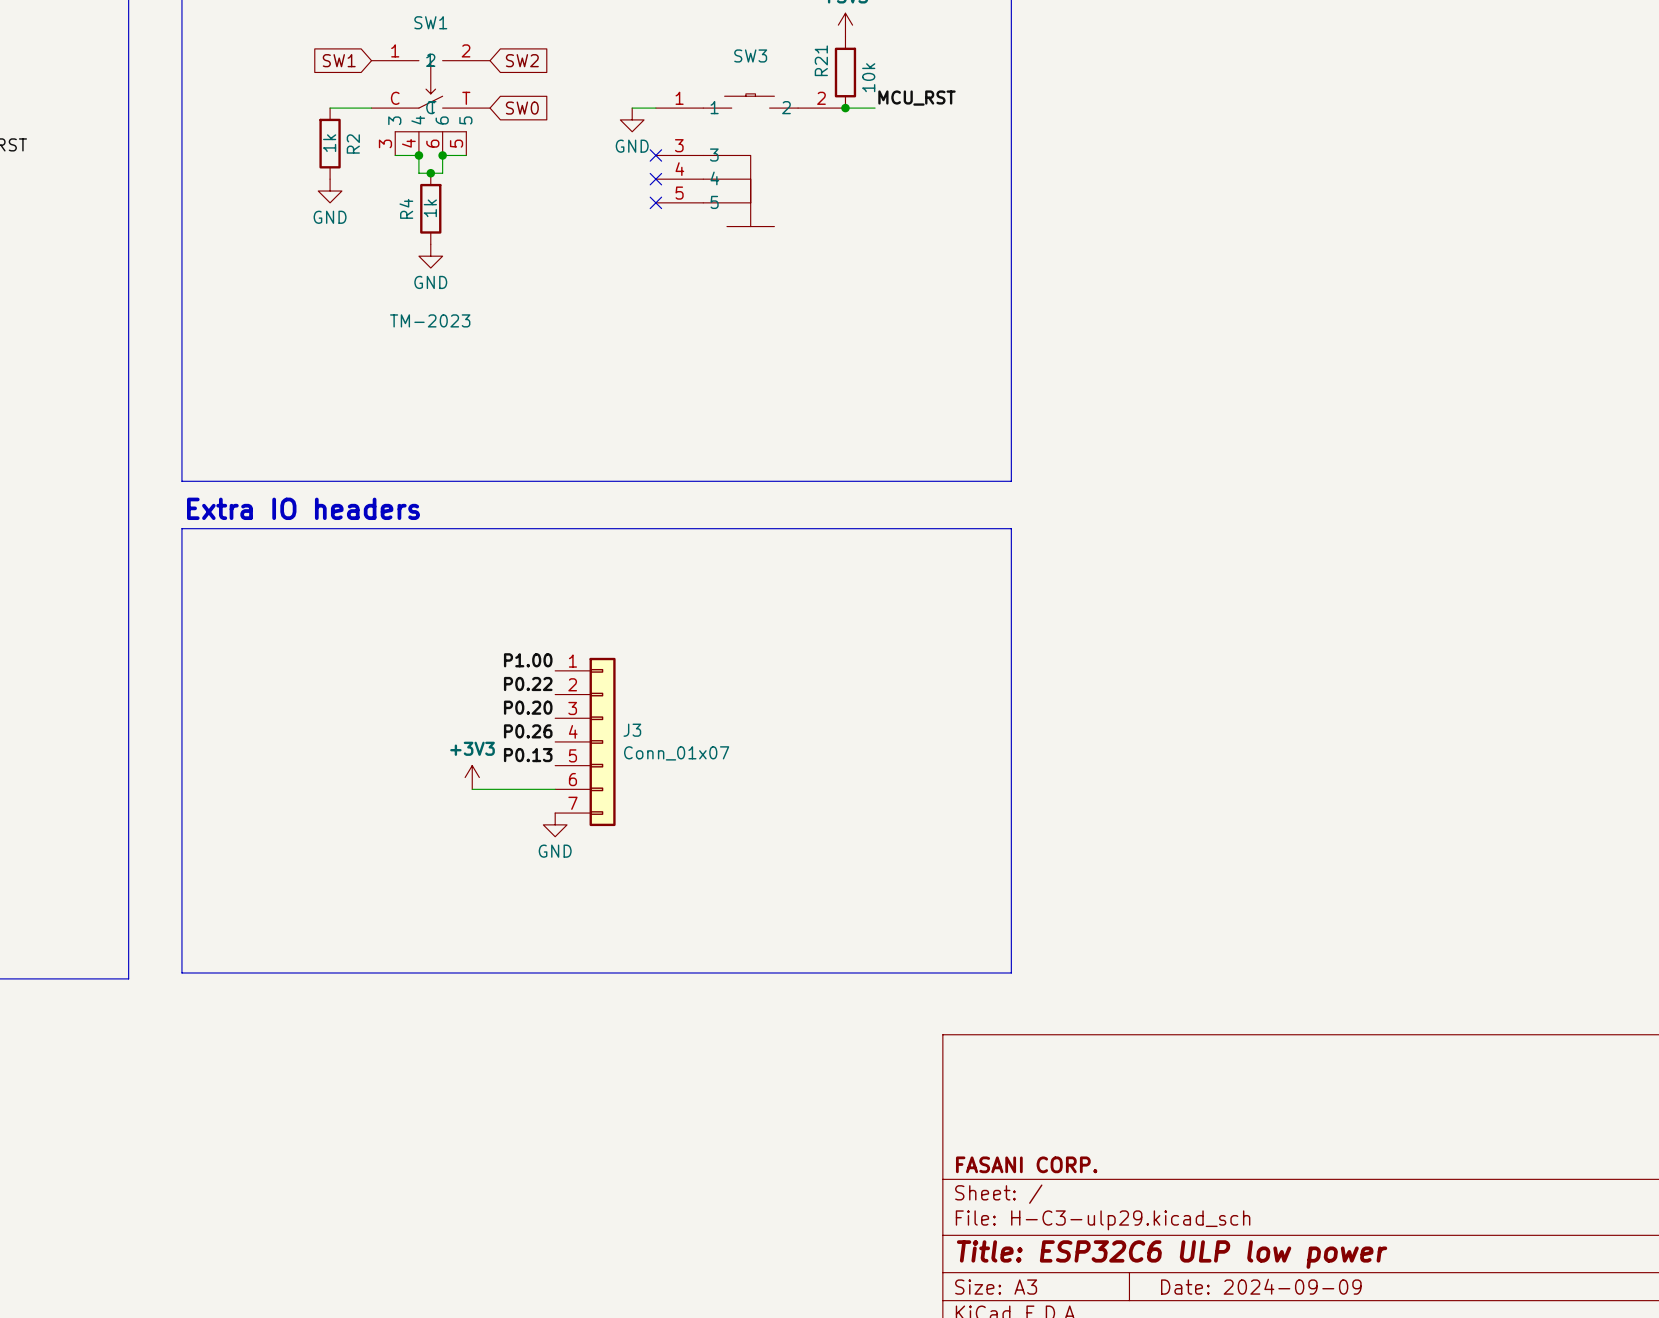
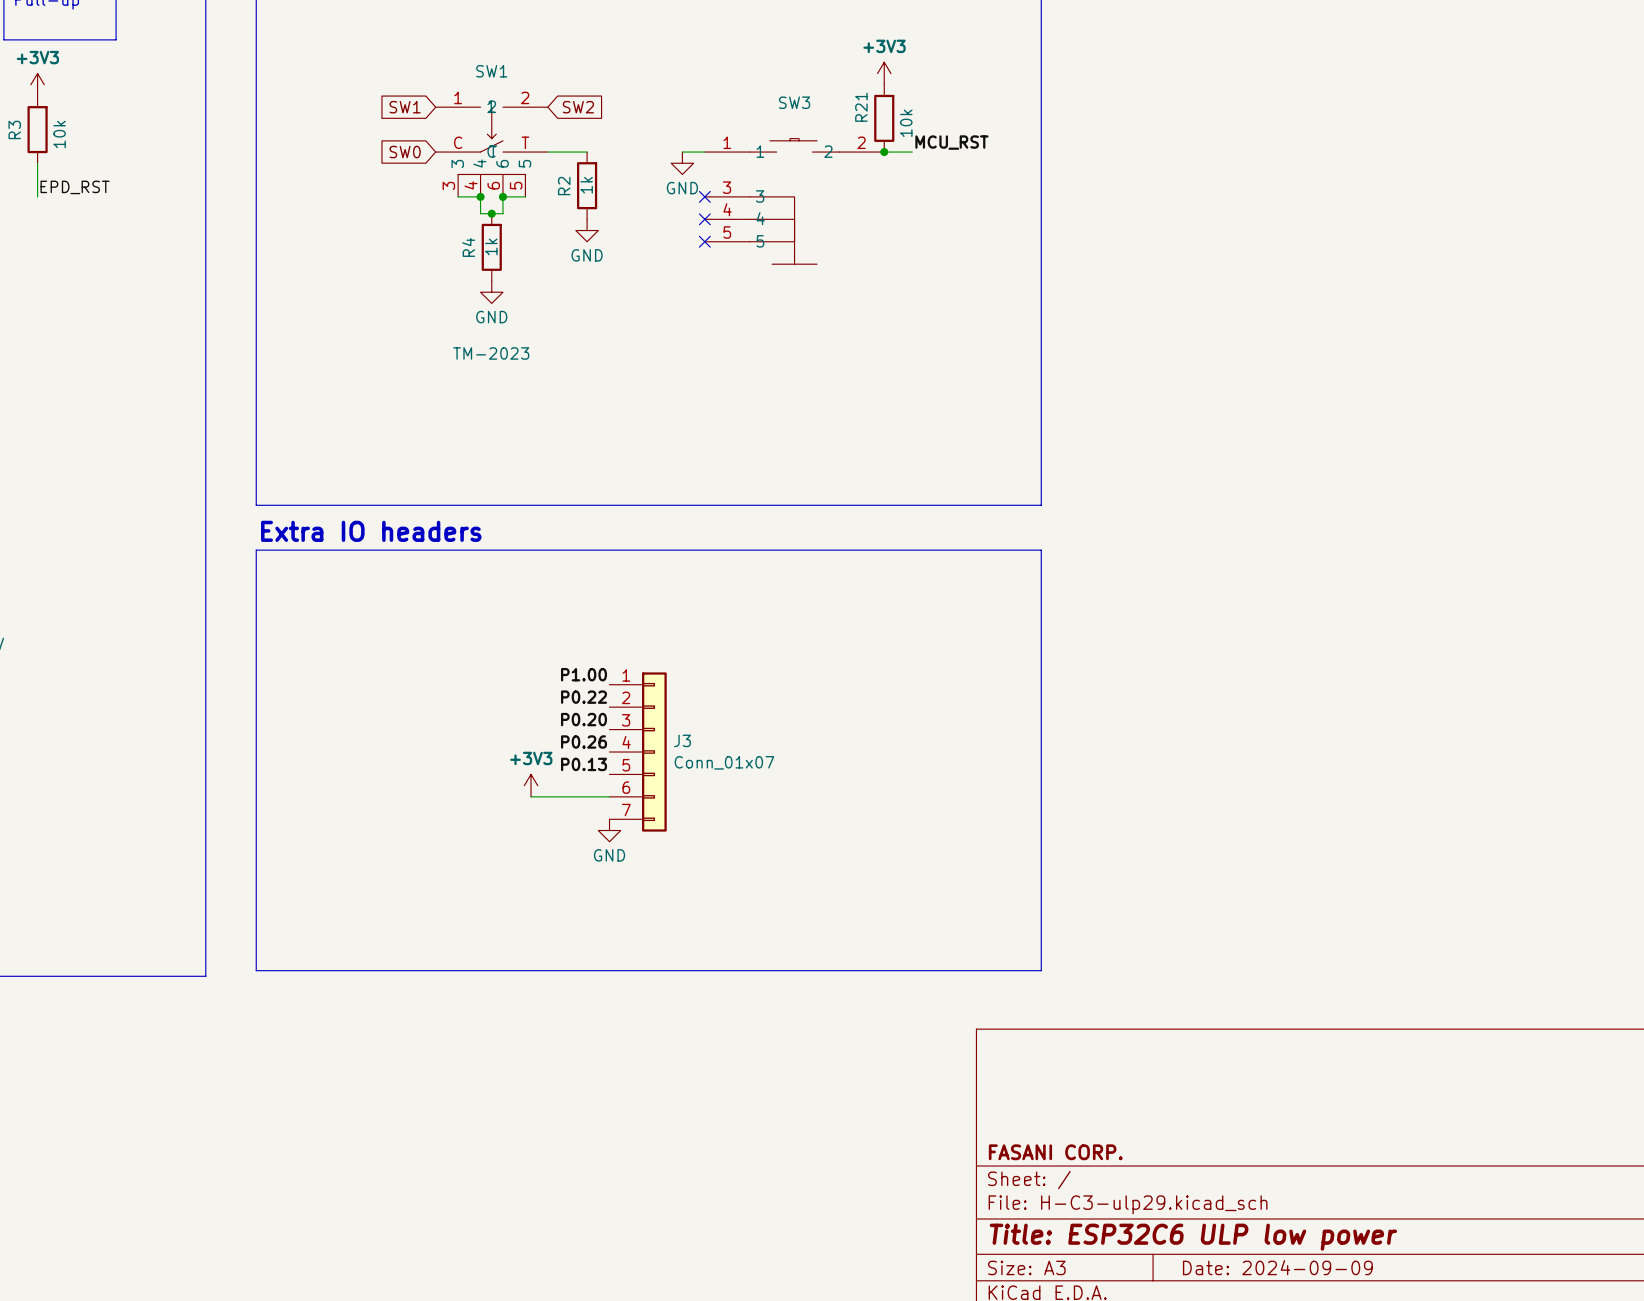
wire: (330, 108) (371, 108) -> (547, 152) (587, 152)
global label rotation: 0° (522, 108) -> 180° (405, 152)
global label position: SW0 (522, 108) -> SW0 (405, 152)
R2 position: (330, 143) -> (587, 185)
R2 name position: R2 (353, 143) -> R2 (564, 186)
power symbol position: GND (330, 191) -> GND (587, 230)

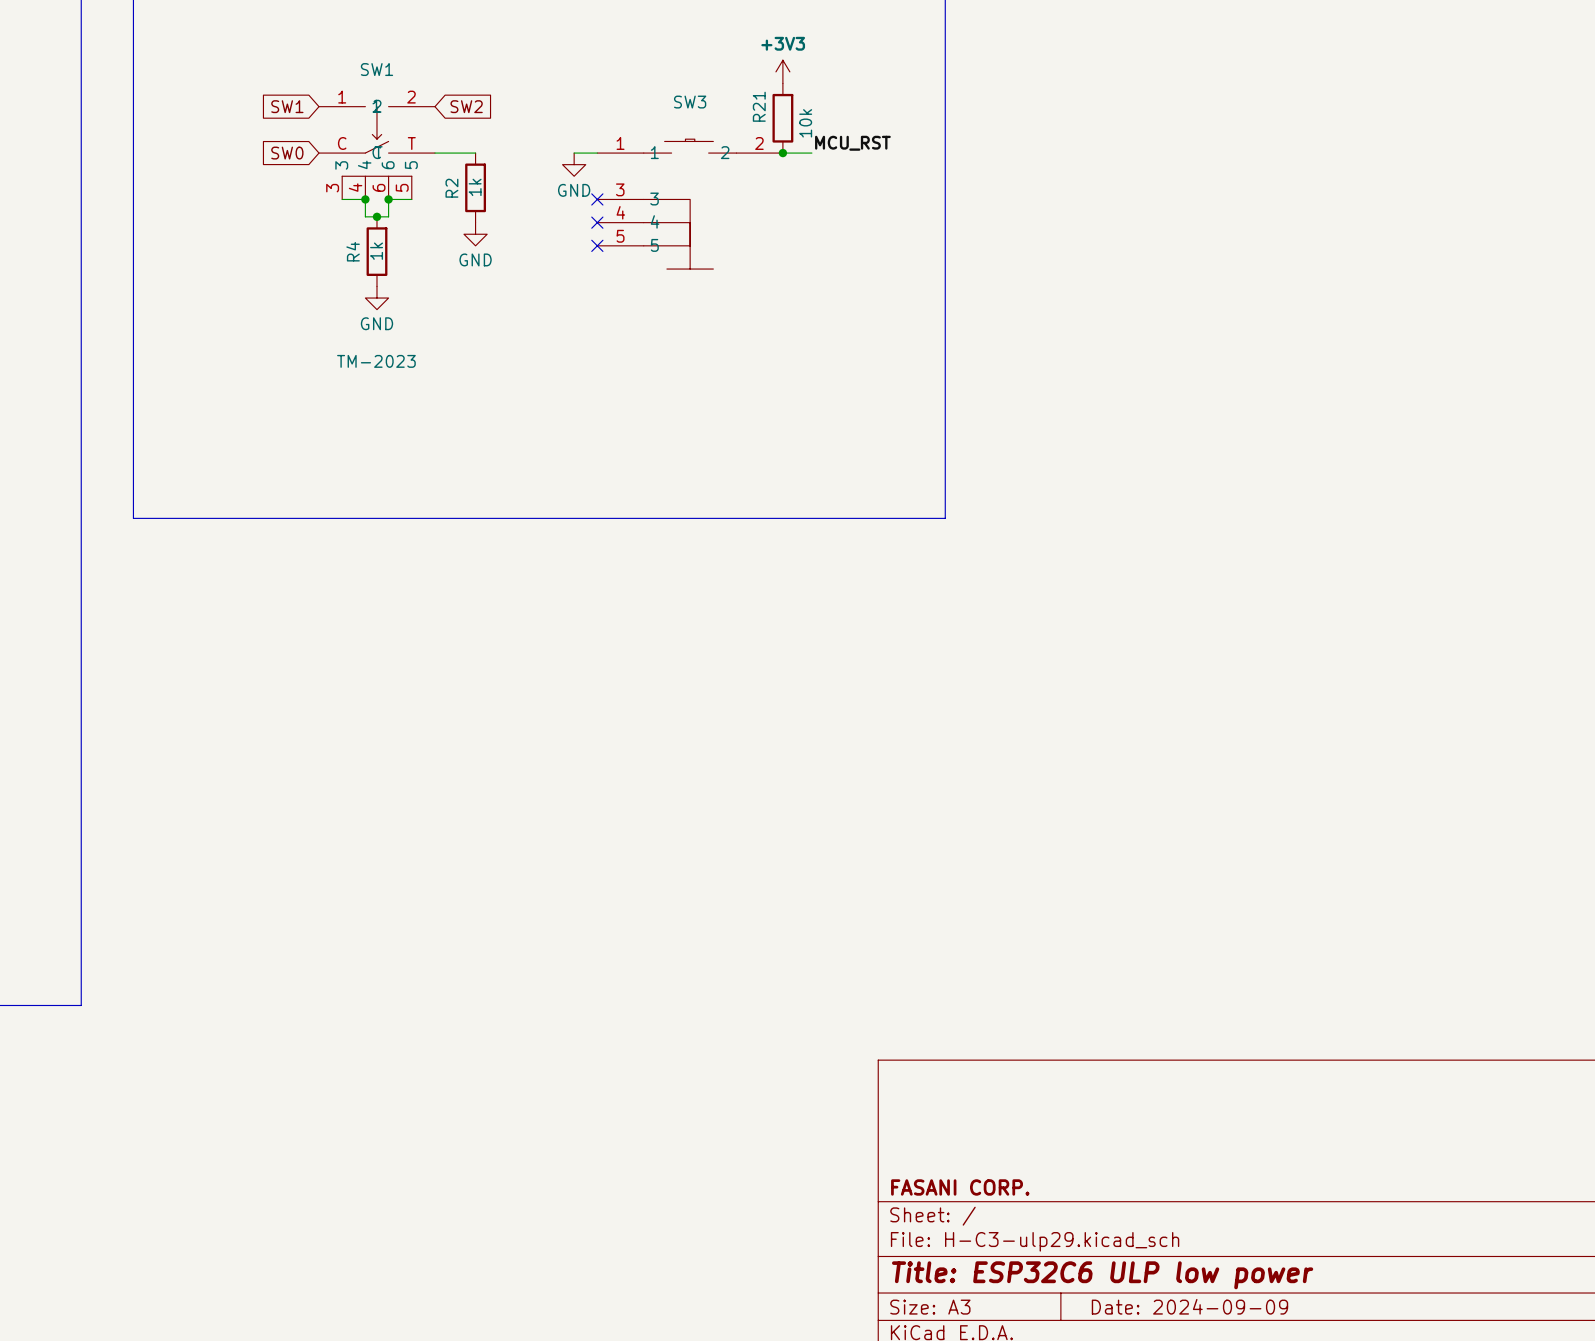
text: Extra IO headers (371, 531) -> none
line: (256, 550) (1041, 550) (1041, 970) (256, 970) (256, 550) -> none
label: P1.00 (584, 674) -> none
label: P0.22 (584, 697) -> none
label: P0.20 (584, 719) -> none
label: P0.26 (584, 742) -> none
J3: Conn_01x07 (638, 752) -> none
label: P0.13 (584, 764) -> none
power symbol: +3V3 (531, 785) -> none
wire: (531, 796) (609, 796) -> none
power symbol: GND (609, 830) -> none

